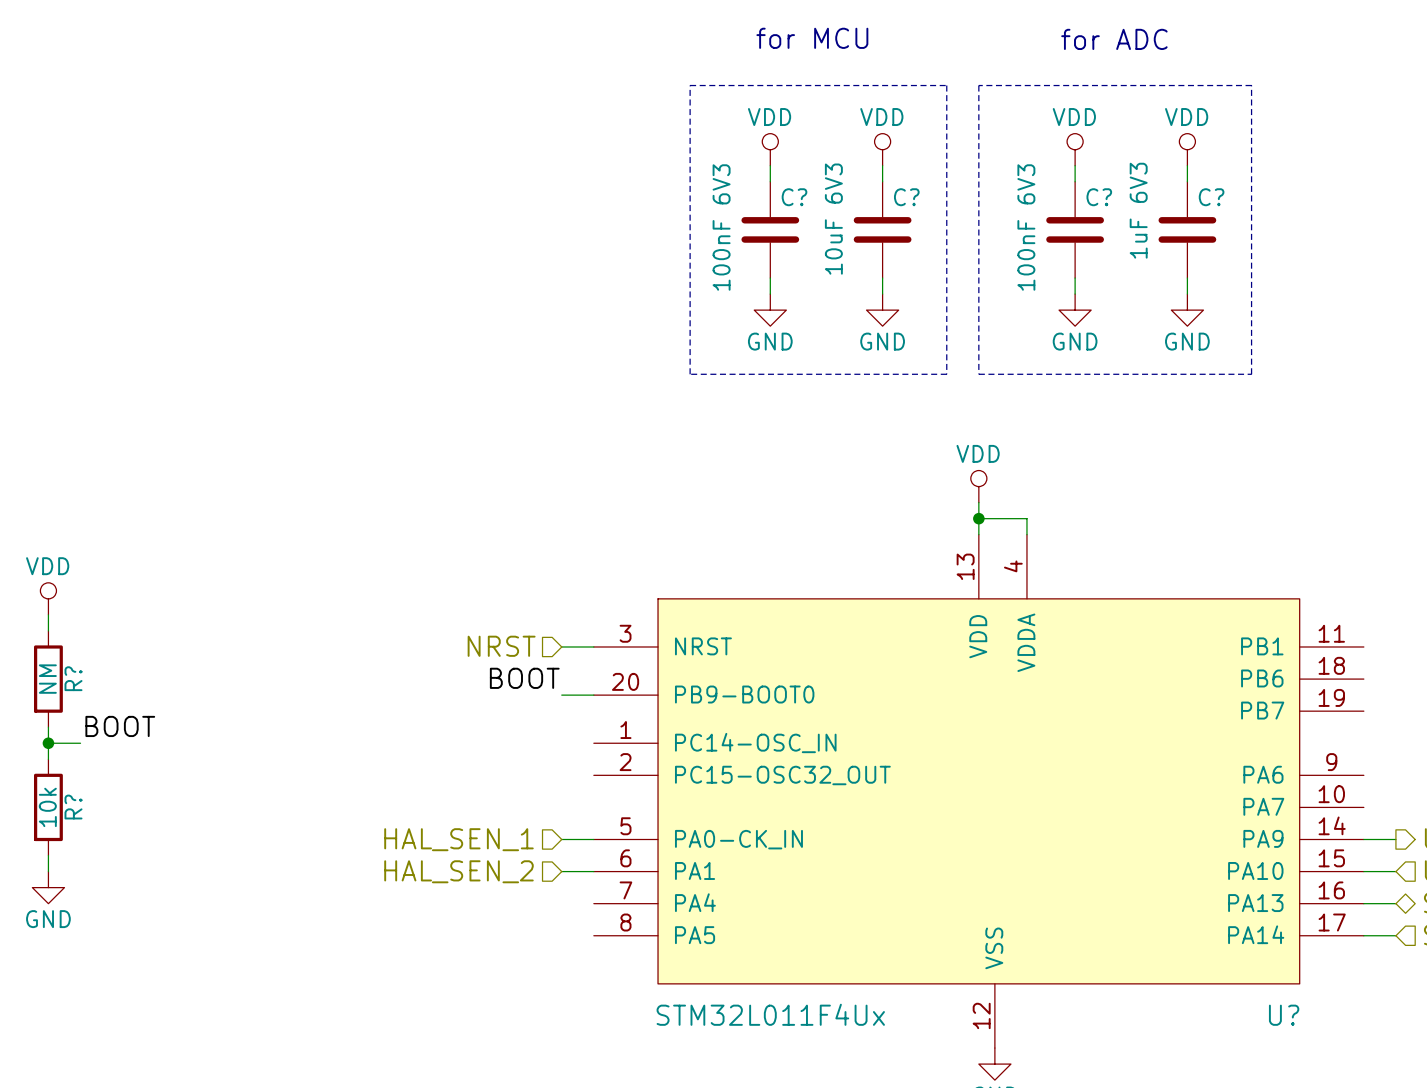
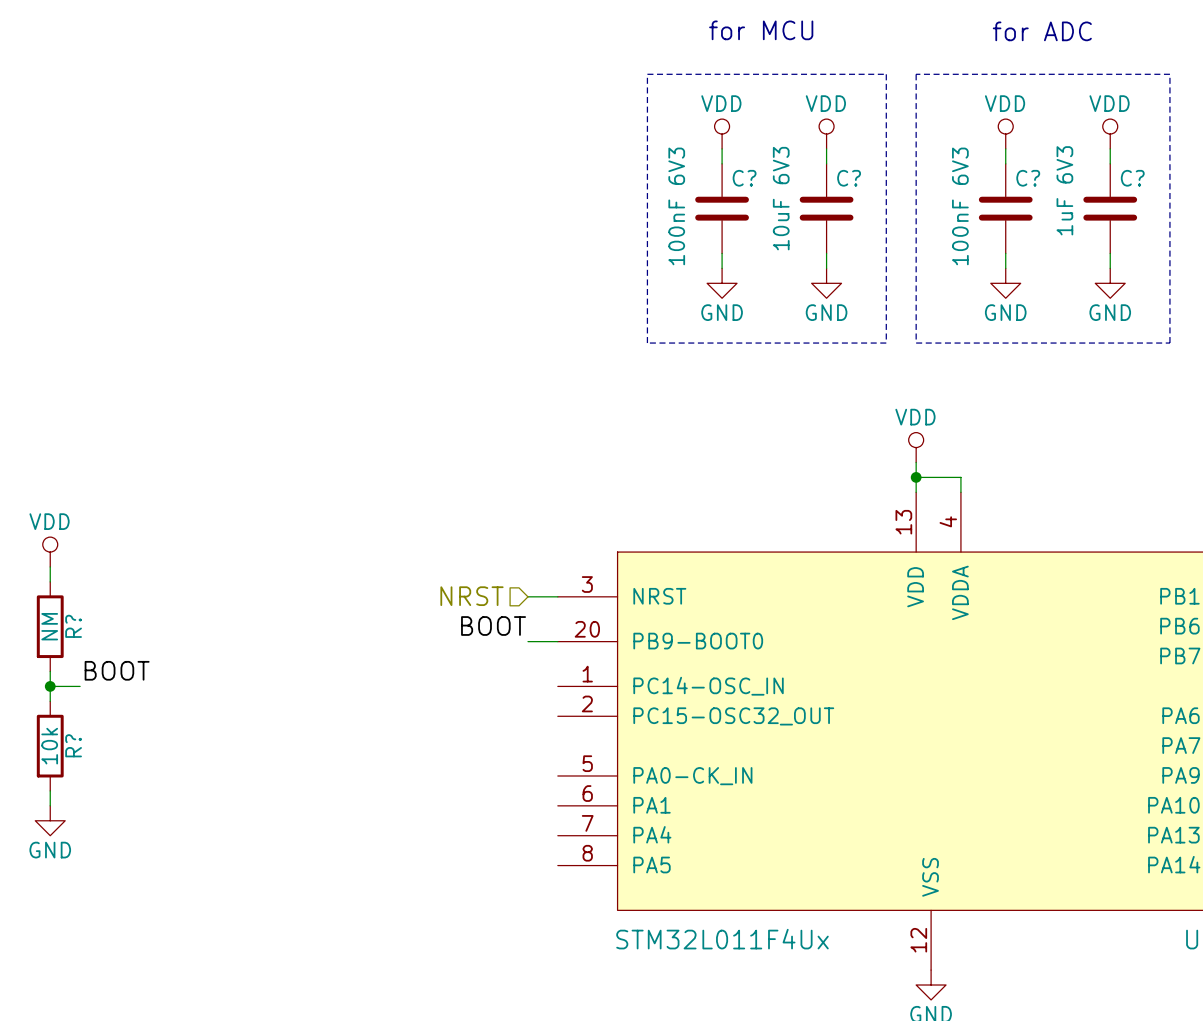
hierarchical label: HAL_SEN_1 (458, 839) -> none
wire: (561, 839) (593, 839) -> none
hierarchical label: HAL_SEN_2 (458, 871) -> none
wire: (561, 871) (593, 871) -> none

